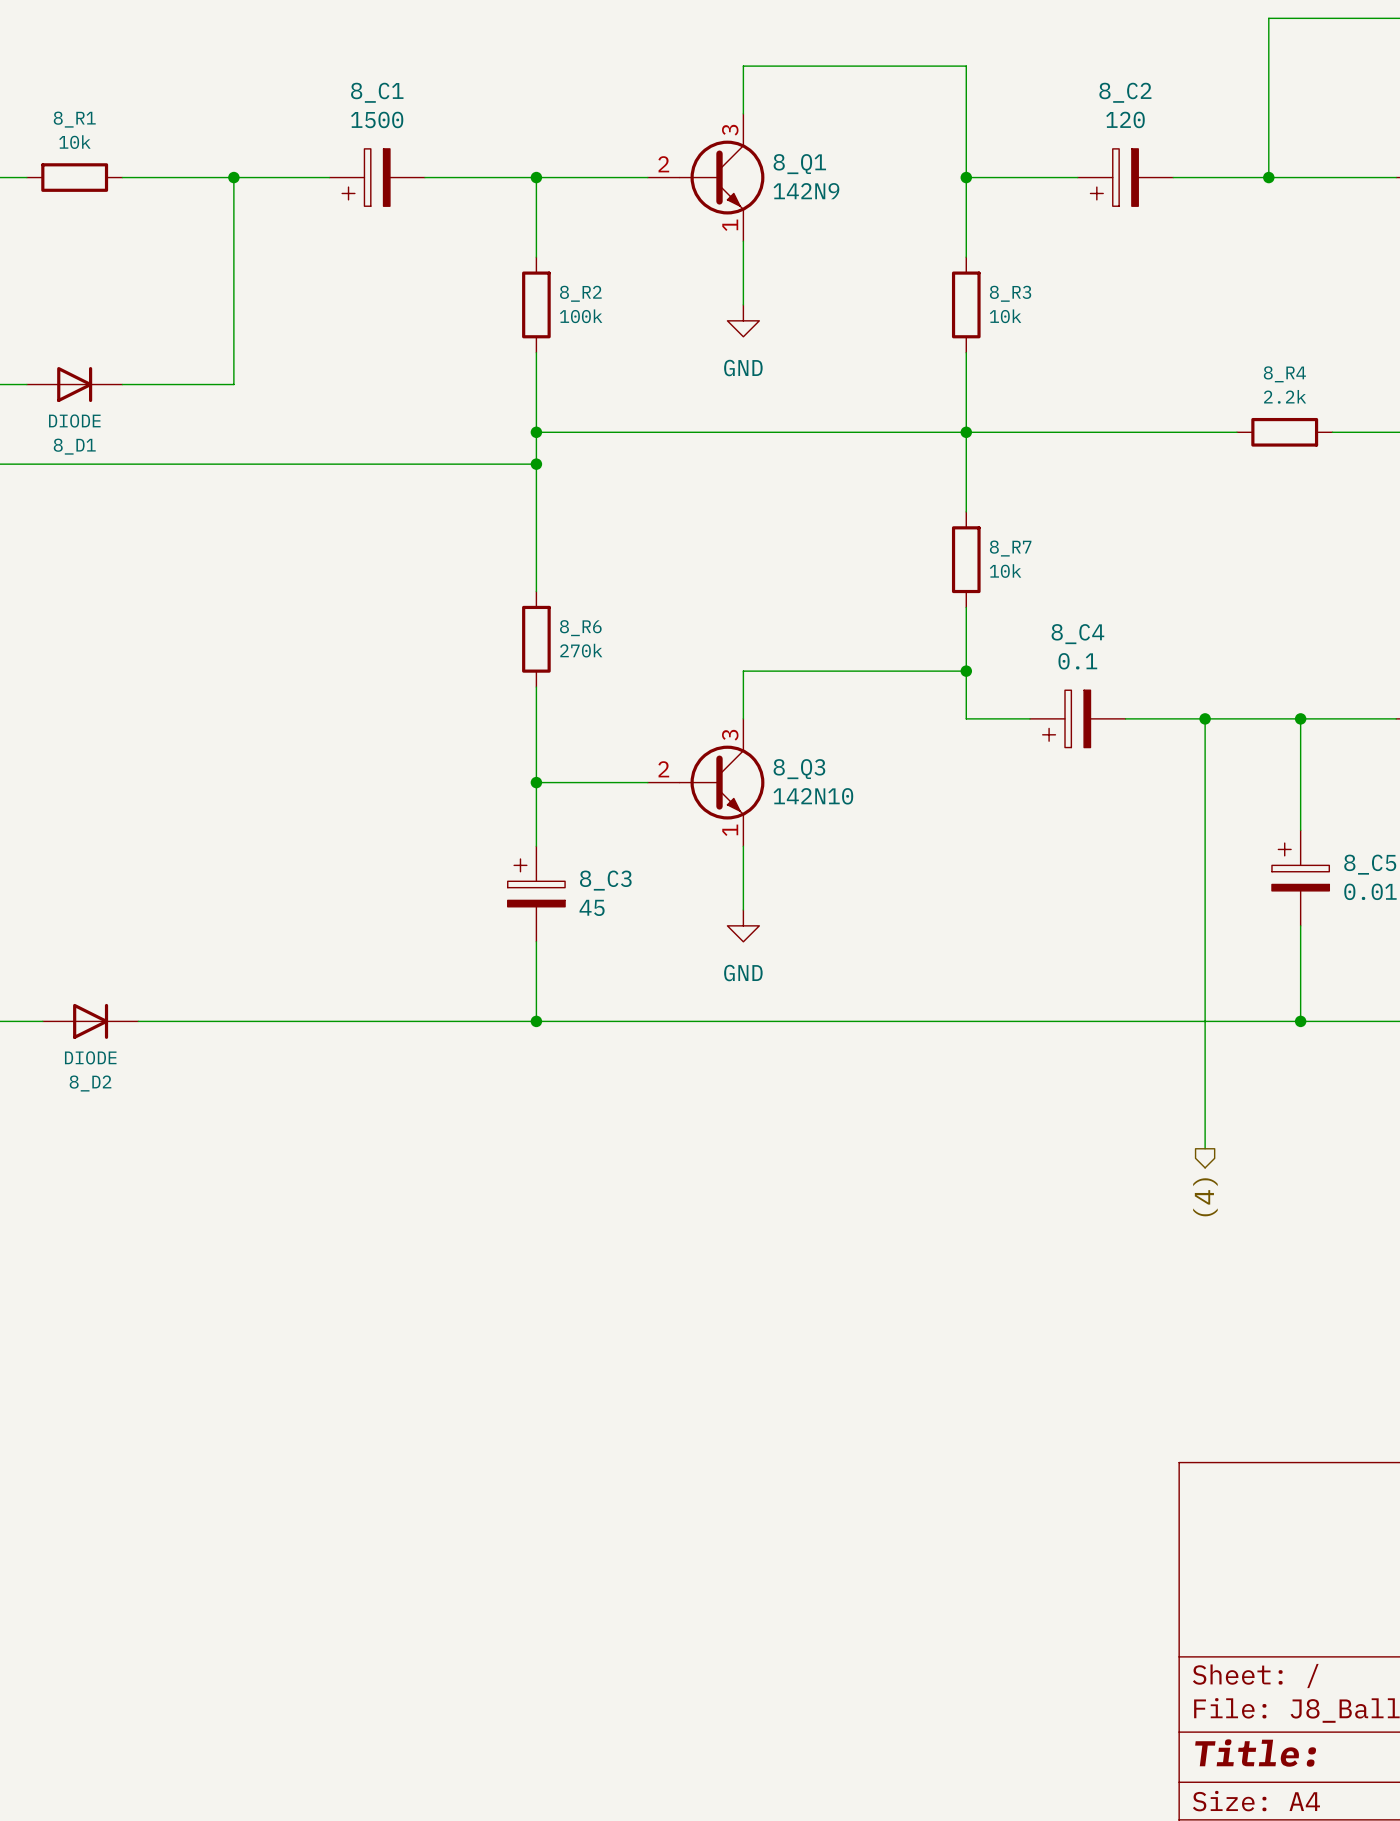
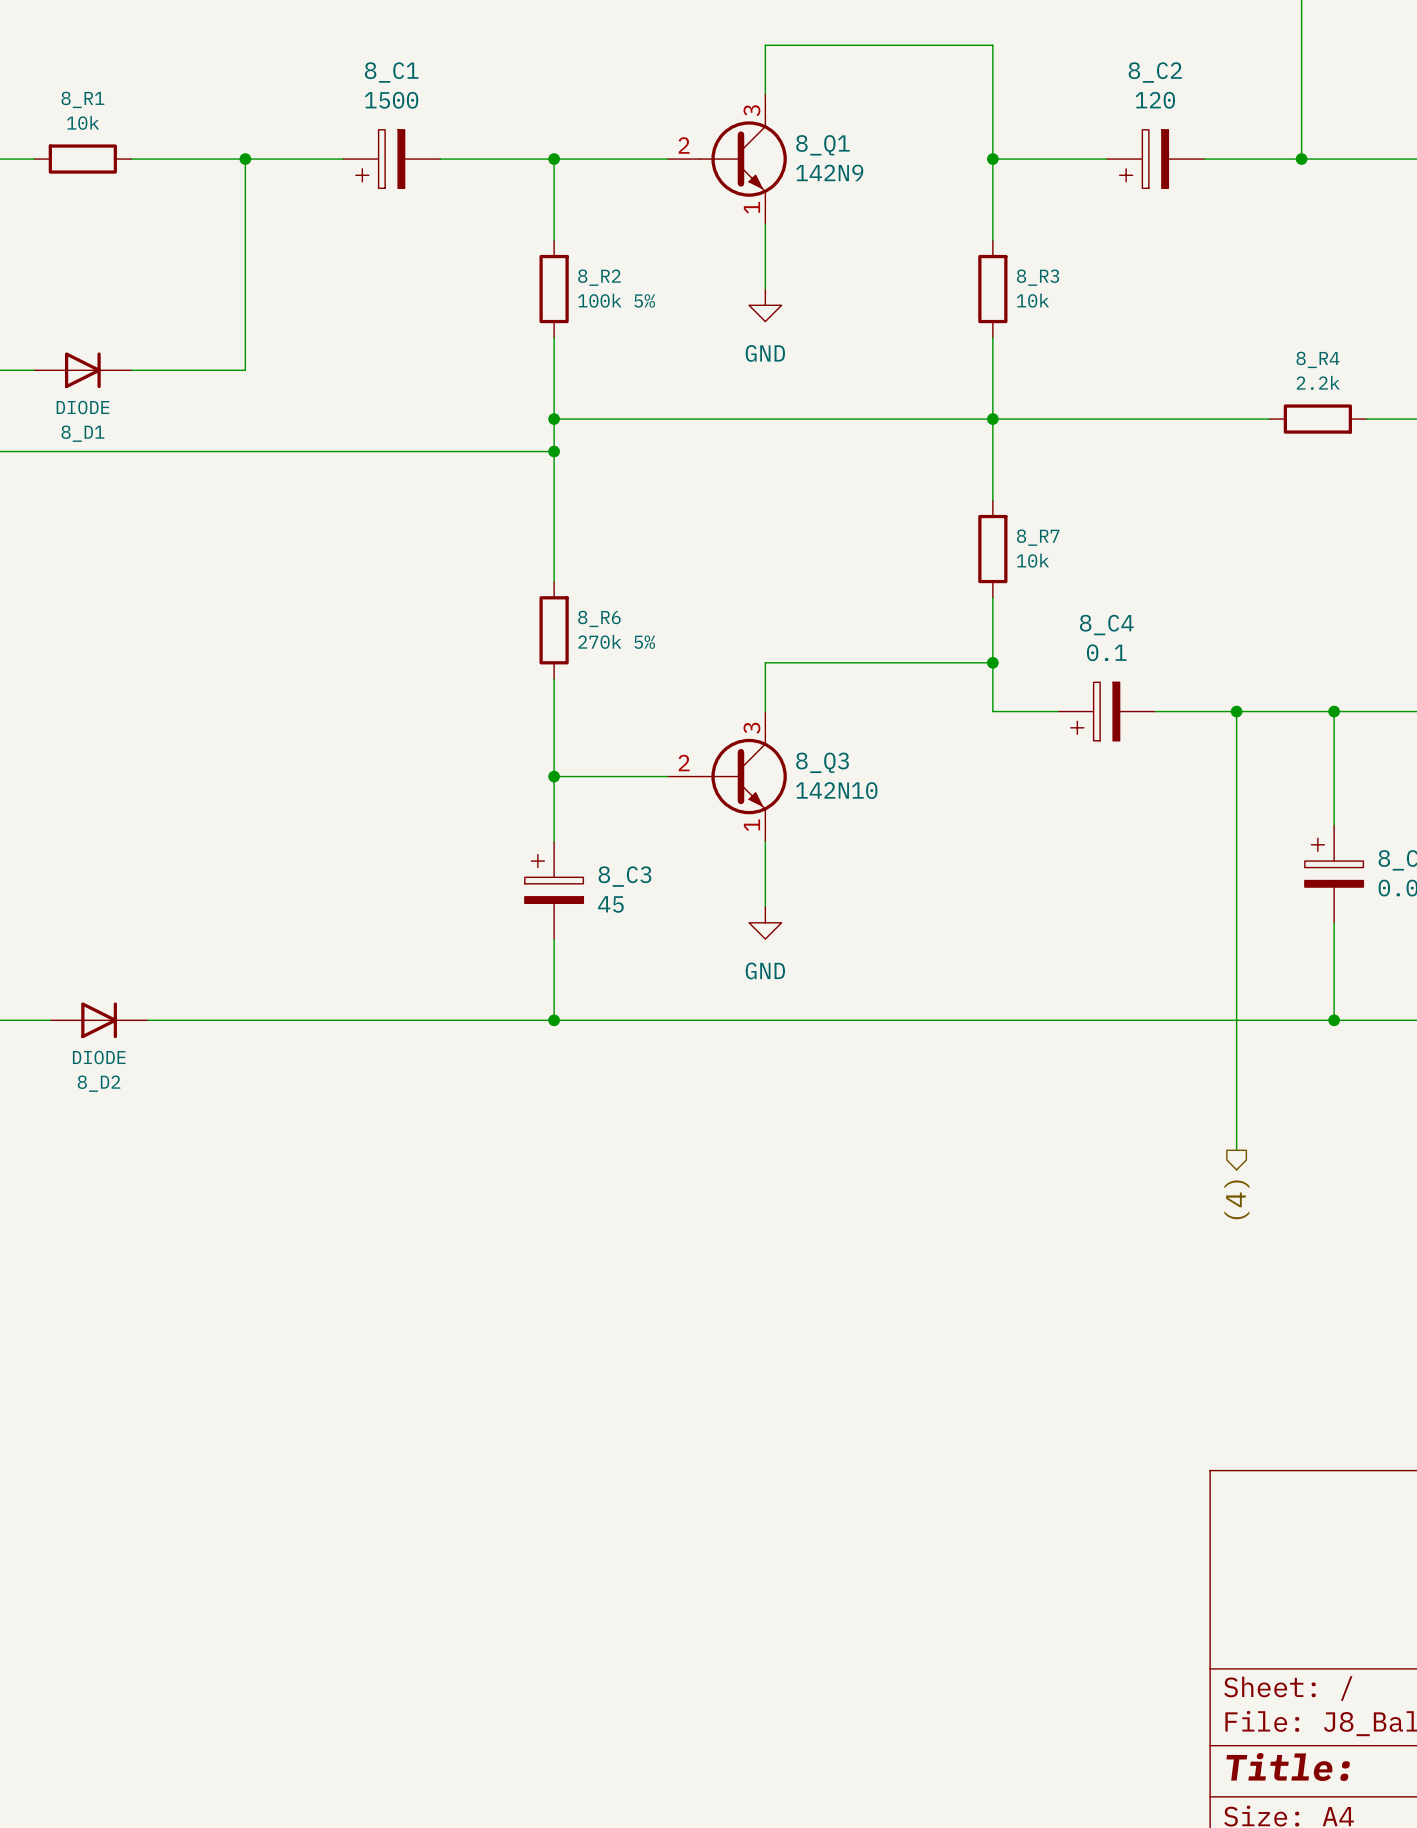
8_R2 value: 100k (581, 316) -> 100k 5% (616, 300)
8_R6 value: 270k (581, 650) -> 270k 5% (616, 641)

